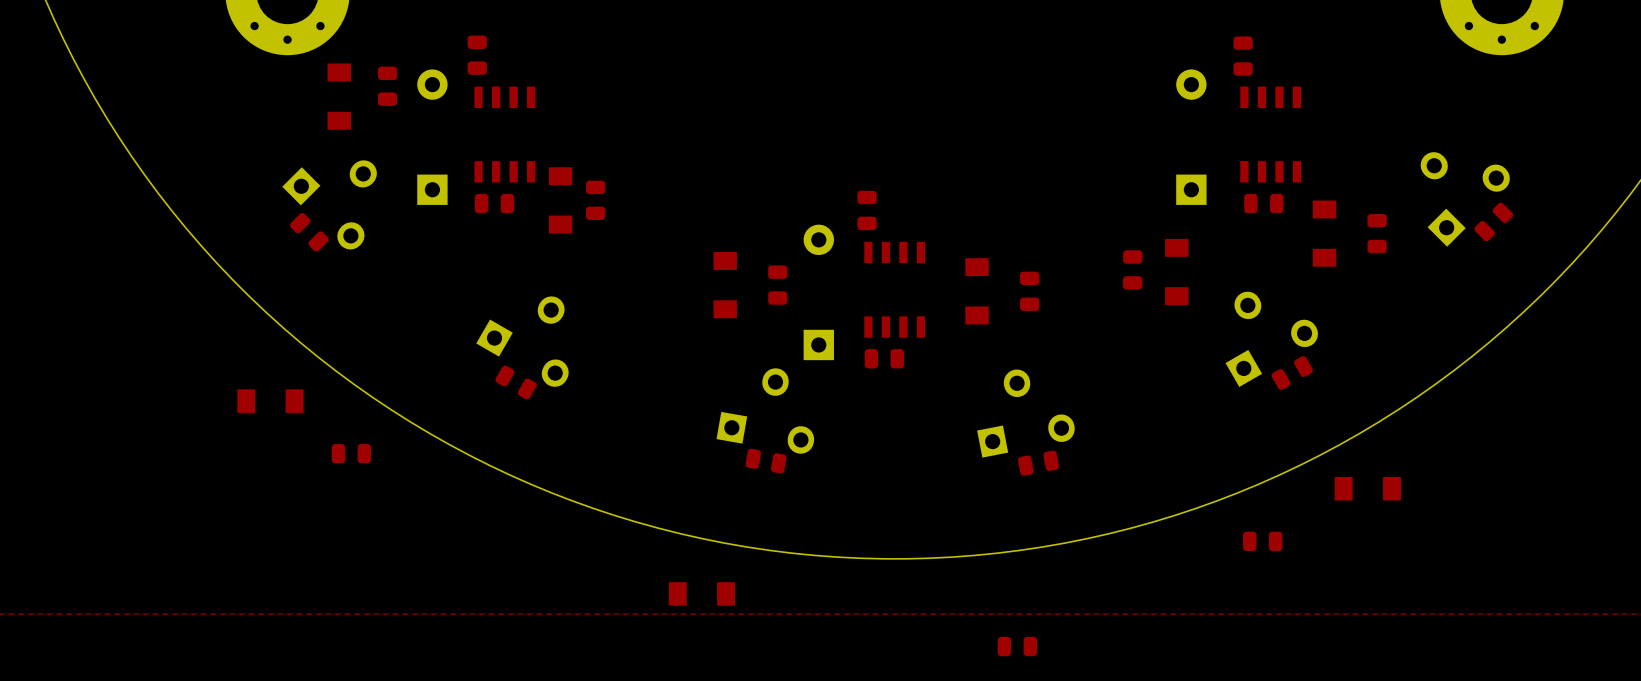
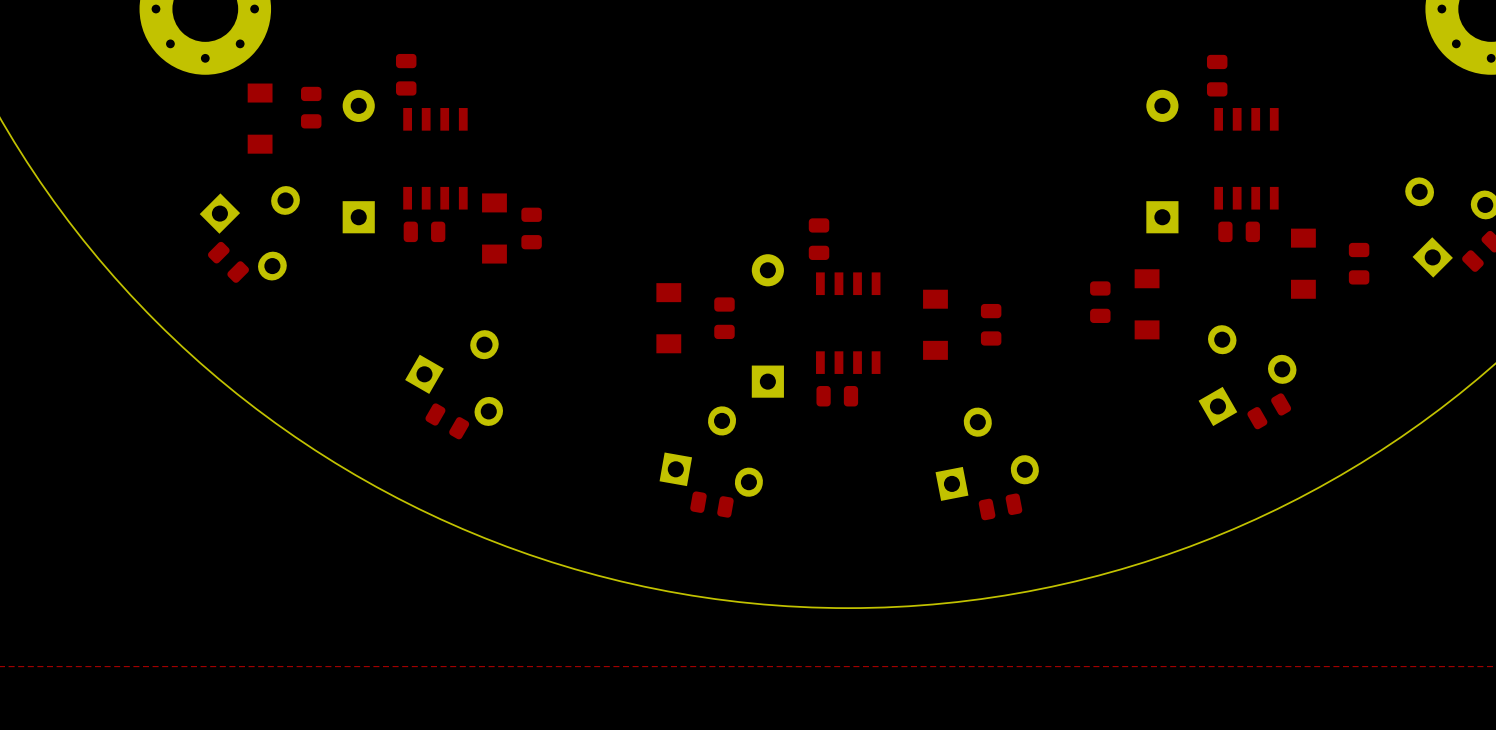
part: (270, 401) -> none
part: (351, 453) -> none
part: (1367, 488) -> none
part: (1262, 541) -> none
part: (701, 593) -> none
part: (1017, 646) -> none

